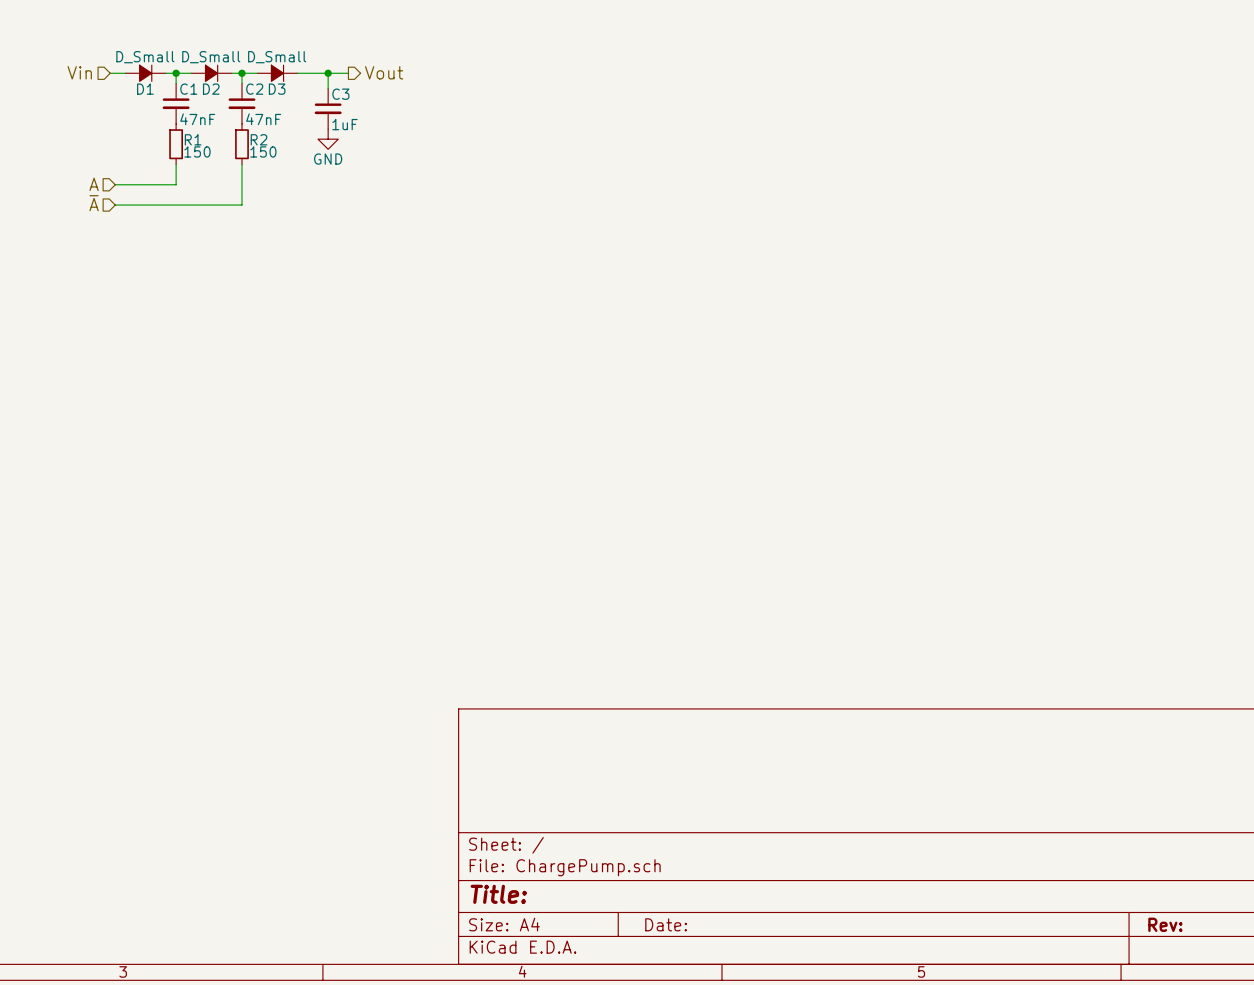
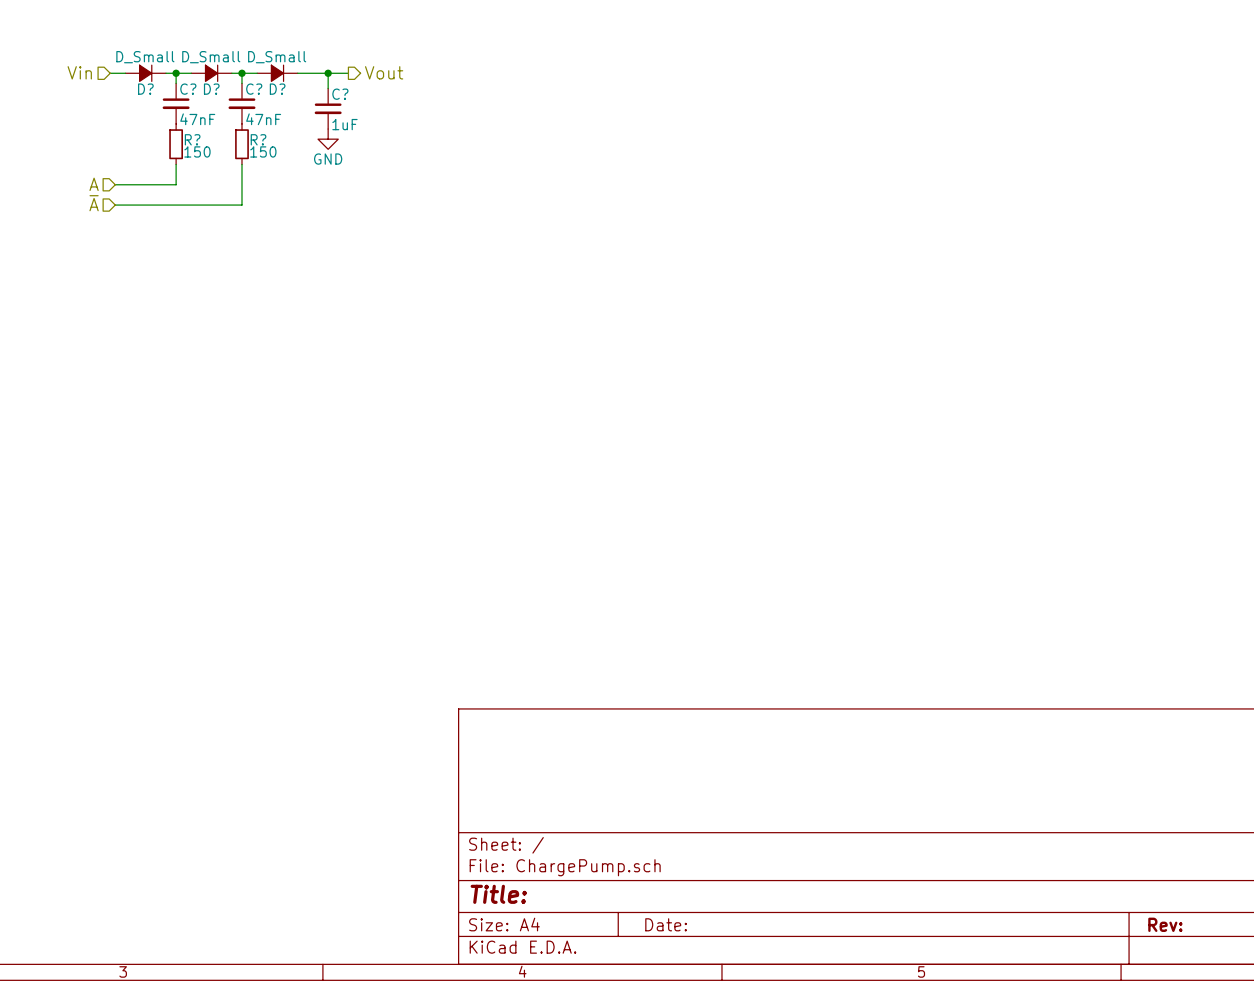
D1 name: D1 (145, 89) -> D? (145, 89)
C1 name: C1 (188, 89) -> C? (188, 89)
D2 name: D2 (211, 89) -> D? (211, 89)
C2 name: C2 (254, 89) -> C? (254, 89)
D3 name: D3 (277, 89) -> D? (277, 89)
C3 name: C3 (340, 94) -> C? (340, 94)
R1 name: R1 (193, 139) -> R? (192, 139)
R2 name: R2 (259, 139) -> R? (258, 139)

